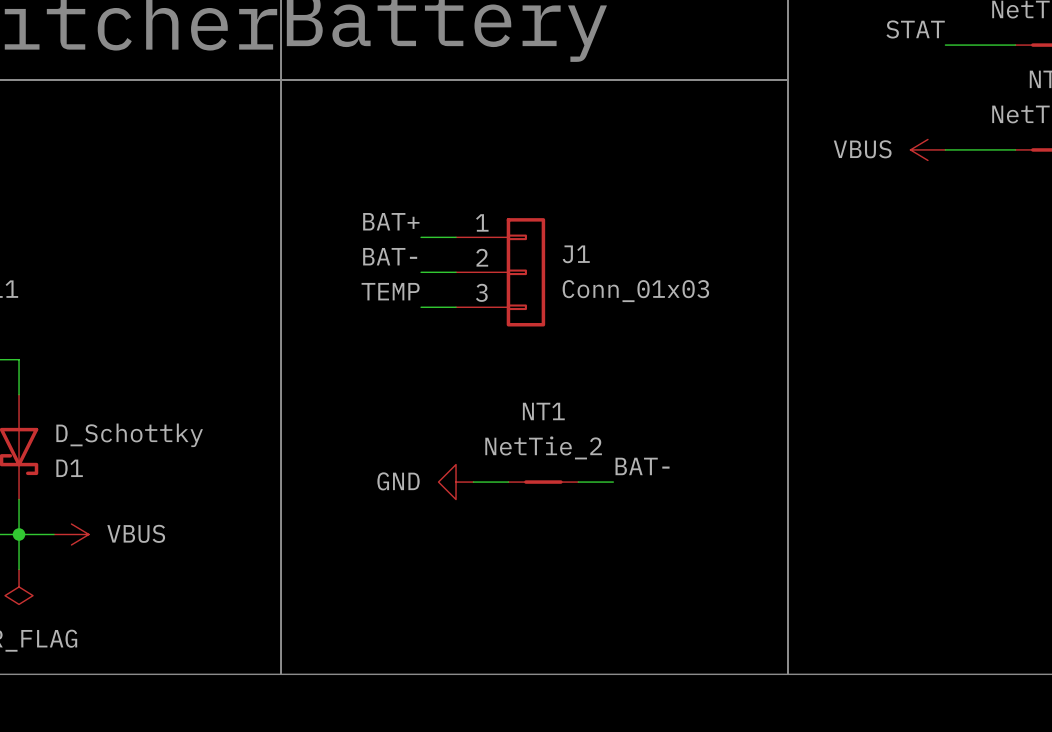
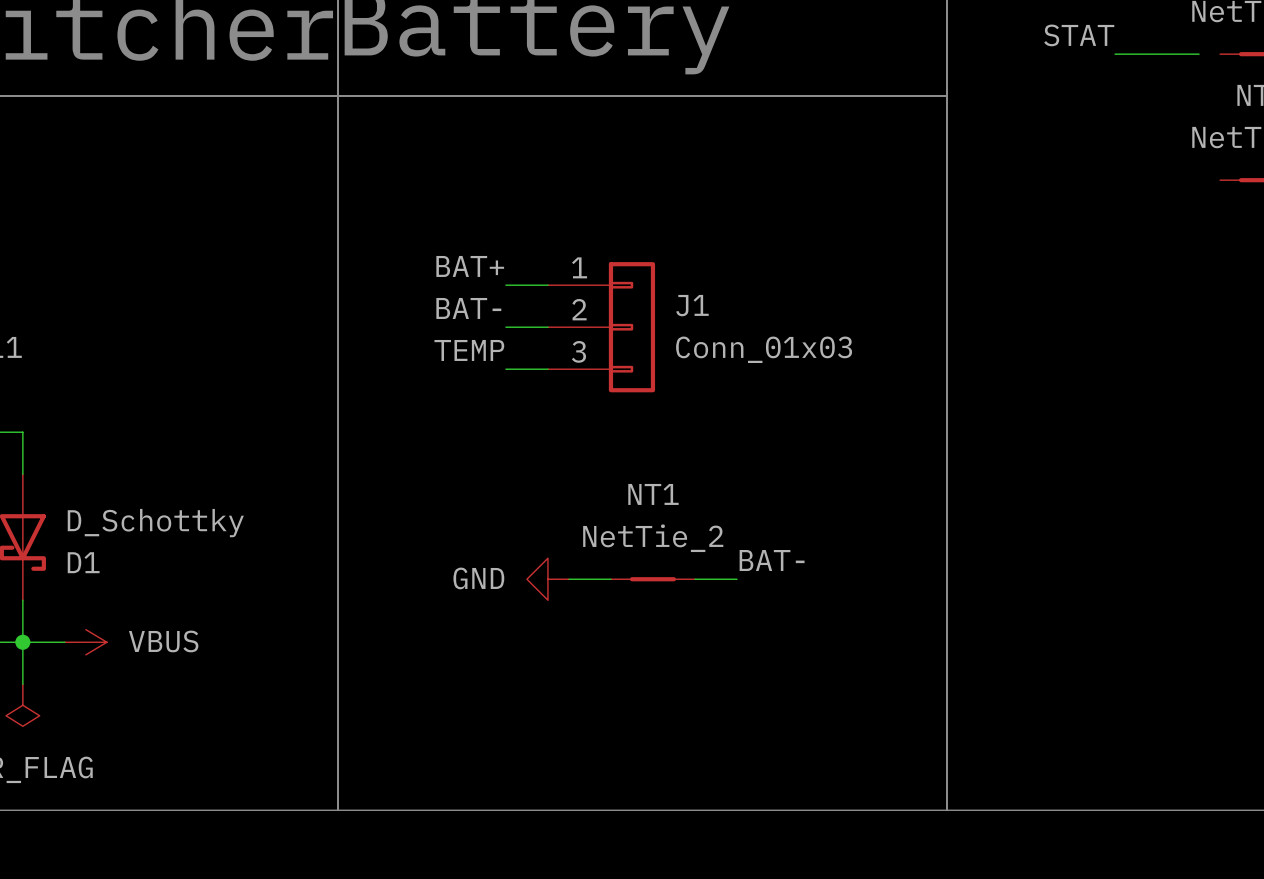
label position: STAT (915, 29) -> STAT (1079, 35)
wire: (997, 45) (1015, 45) -> (1115, 54) (1136, 54)
power symbol: VBUS (927, 149) -> none
wire: (945, 149) (1015, 149) -> none

